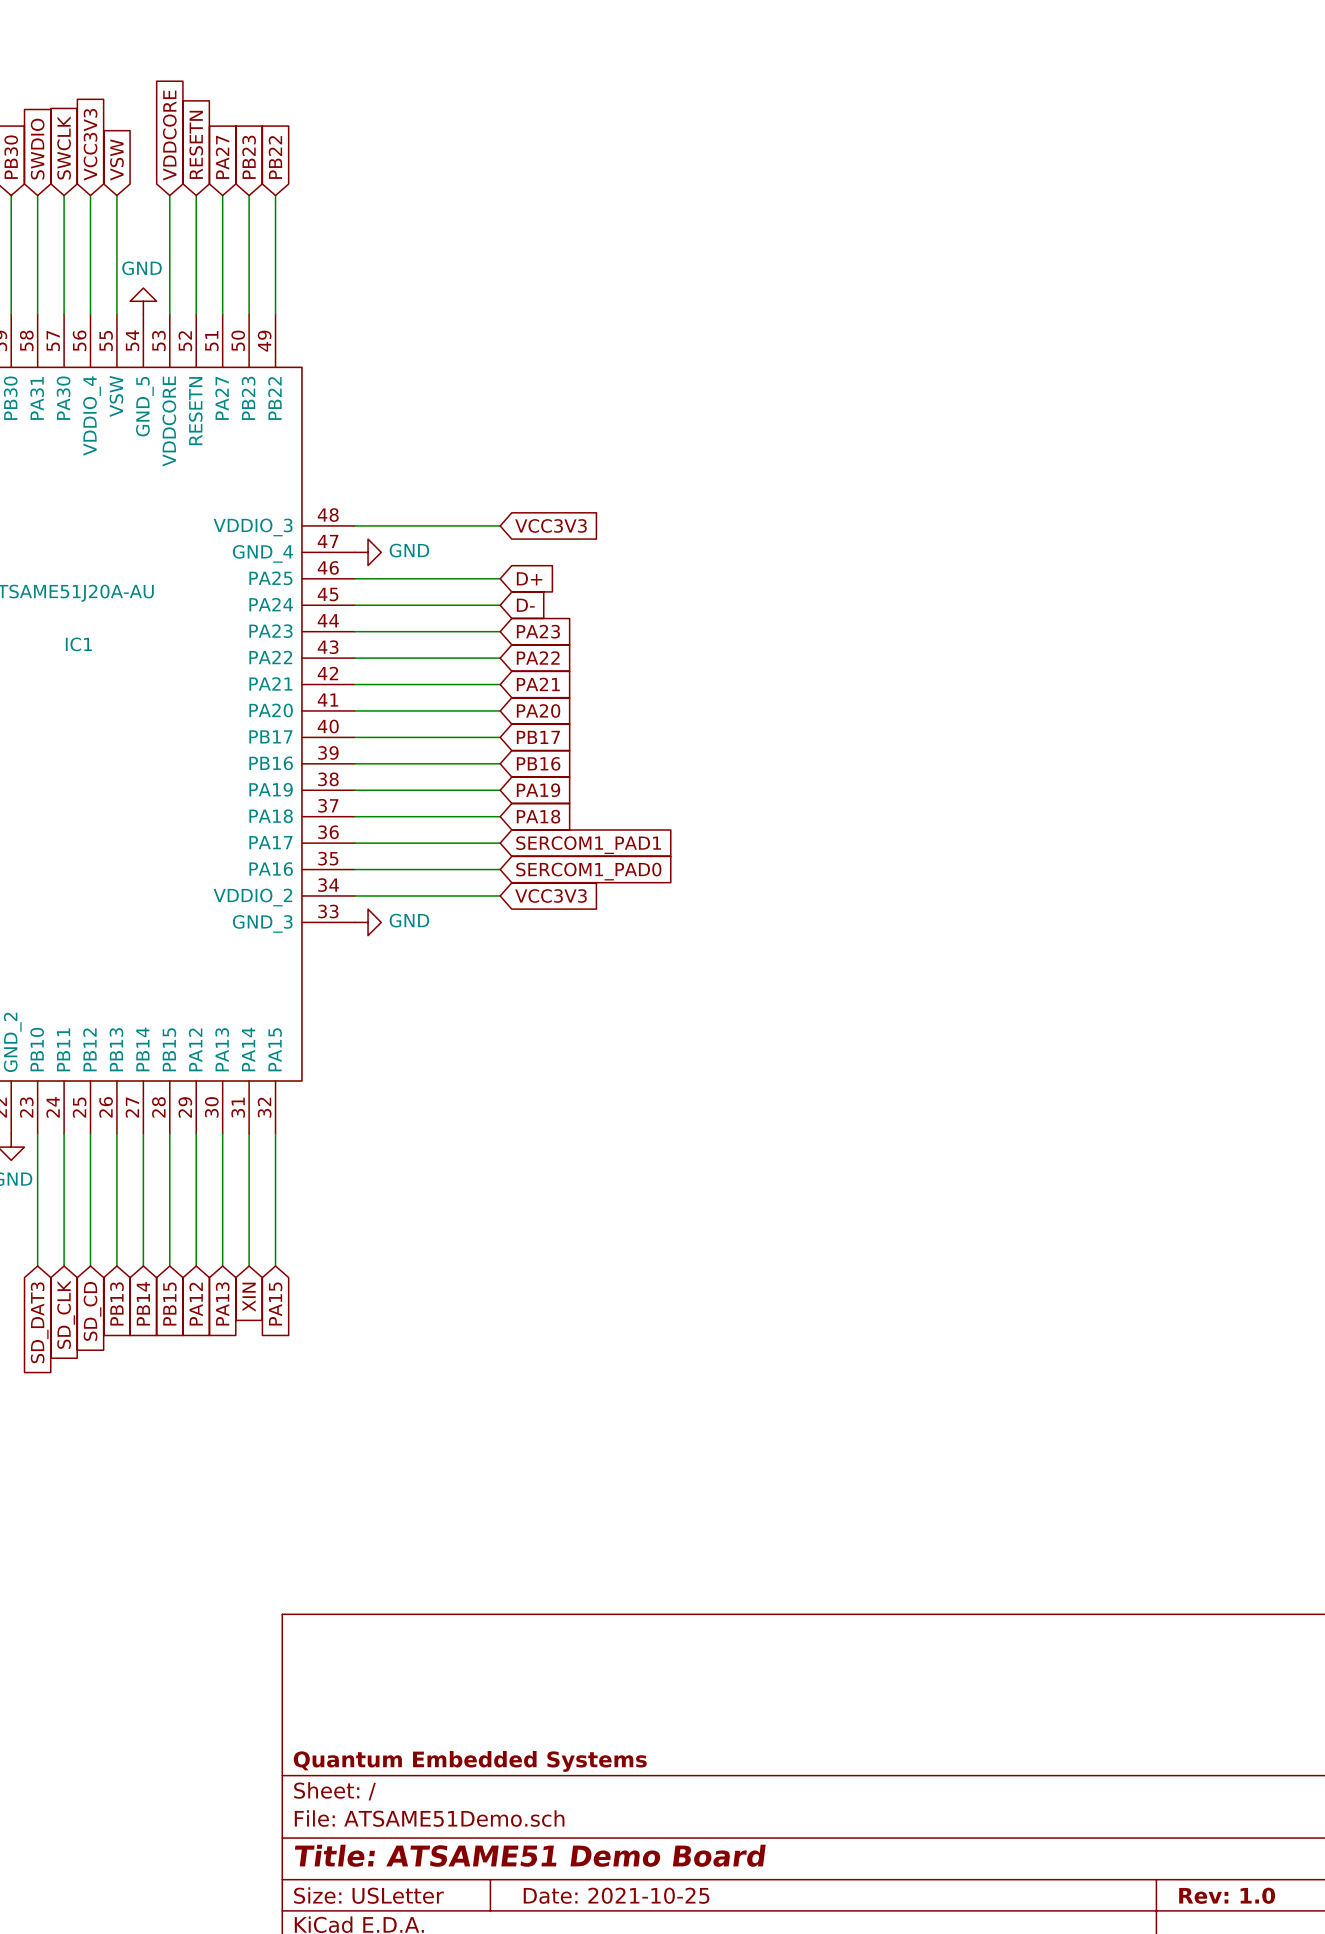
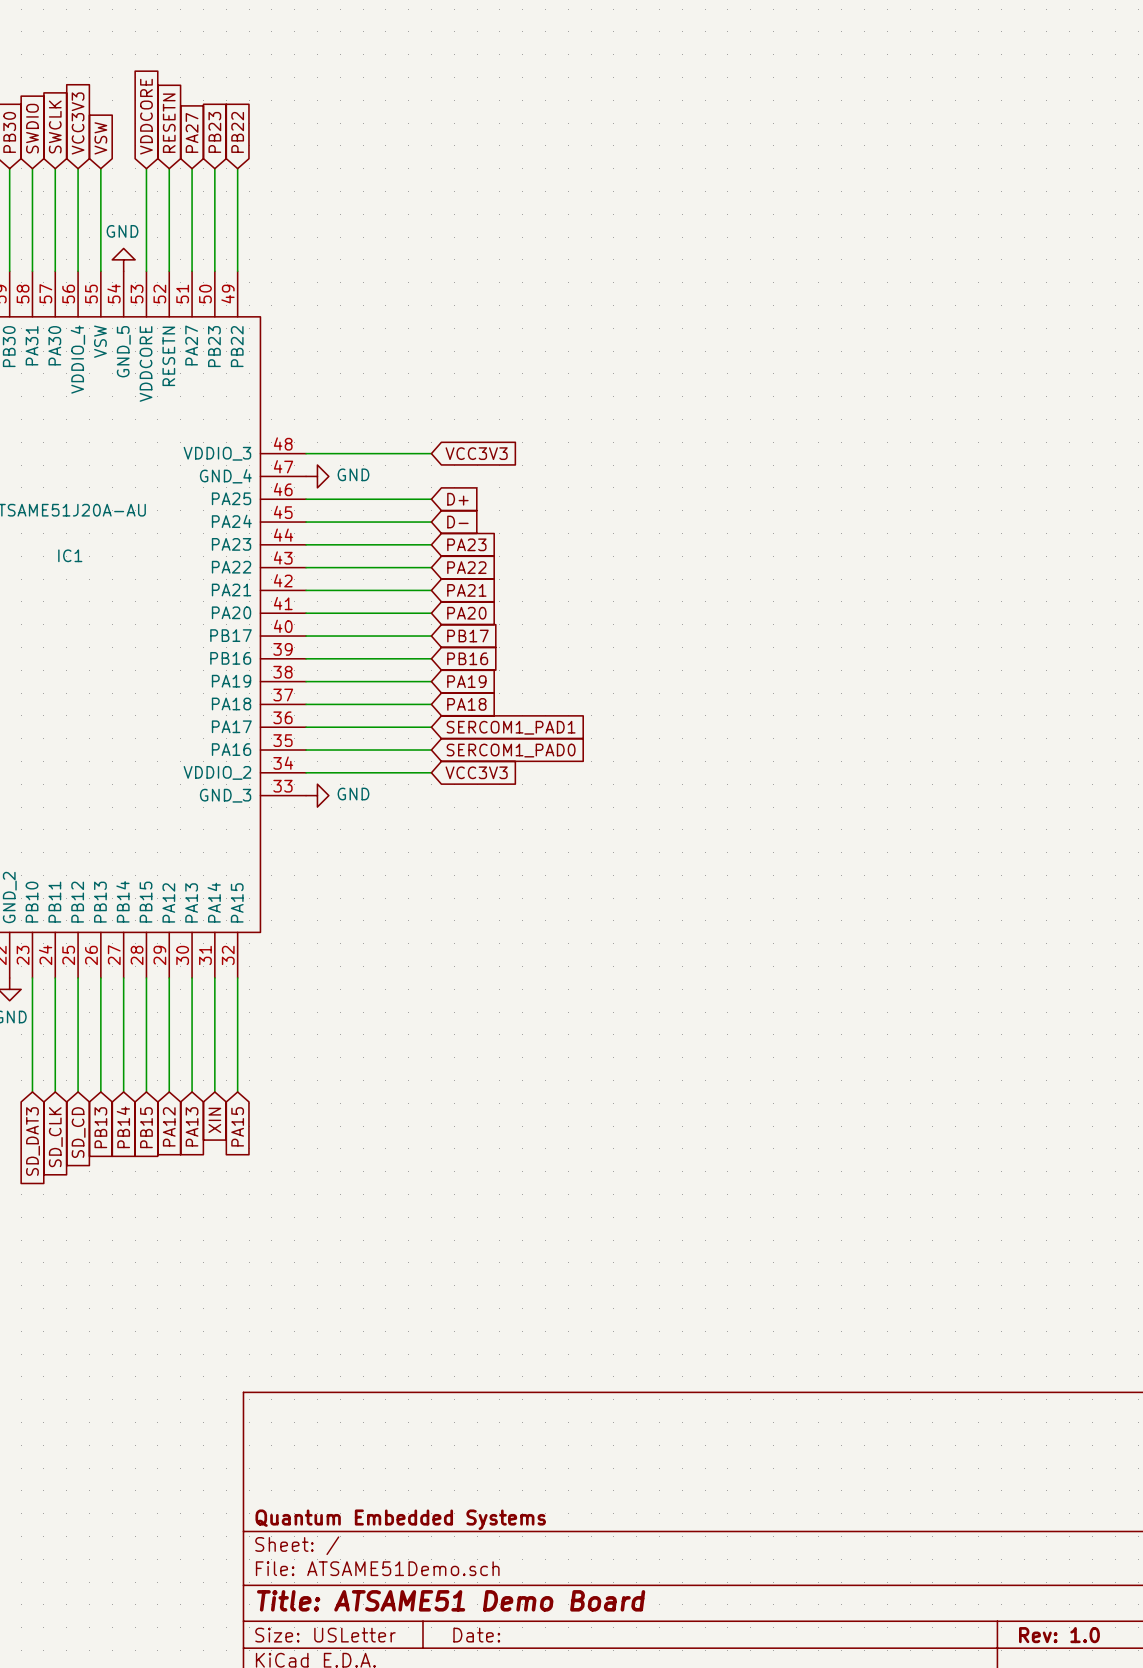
title block: Date: 2021-10-25 (616, 1895) -> Date: (476, 1635)

